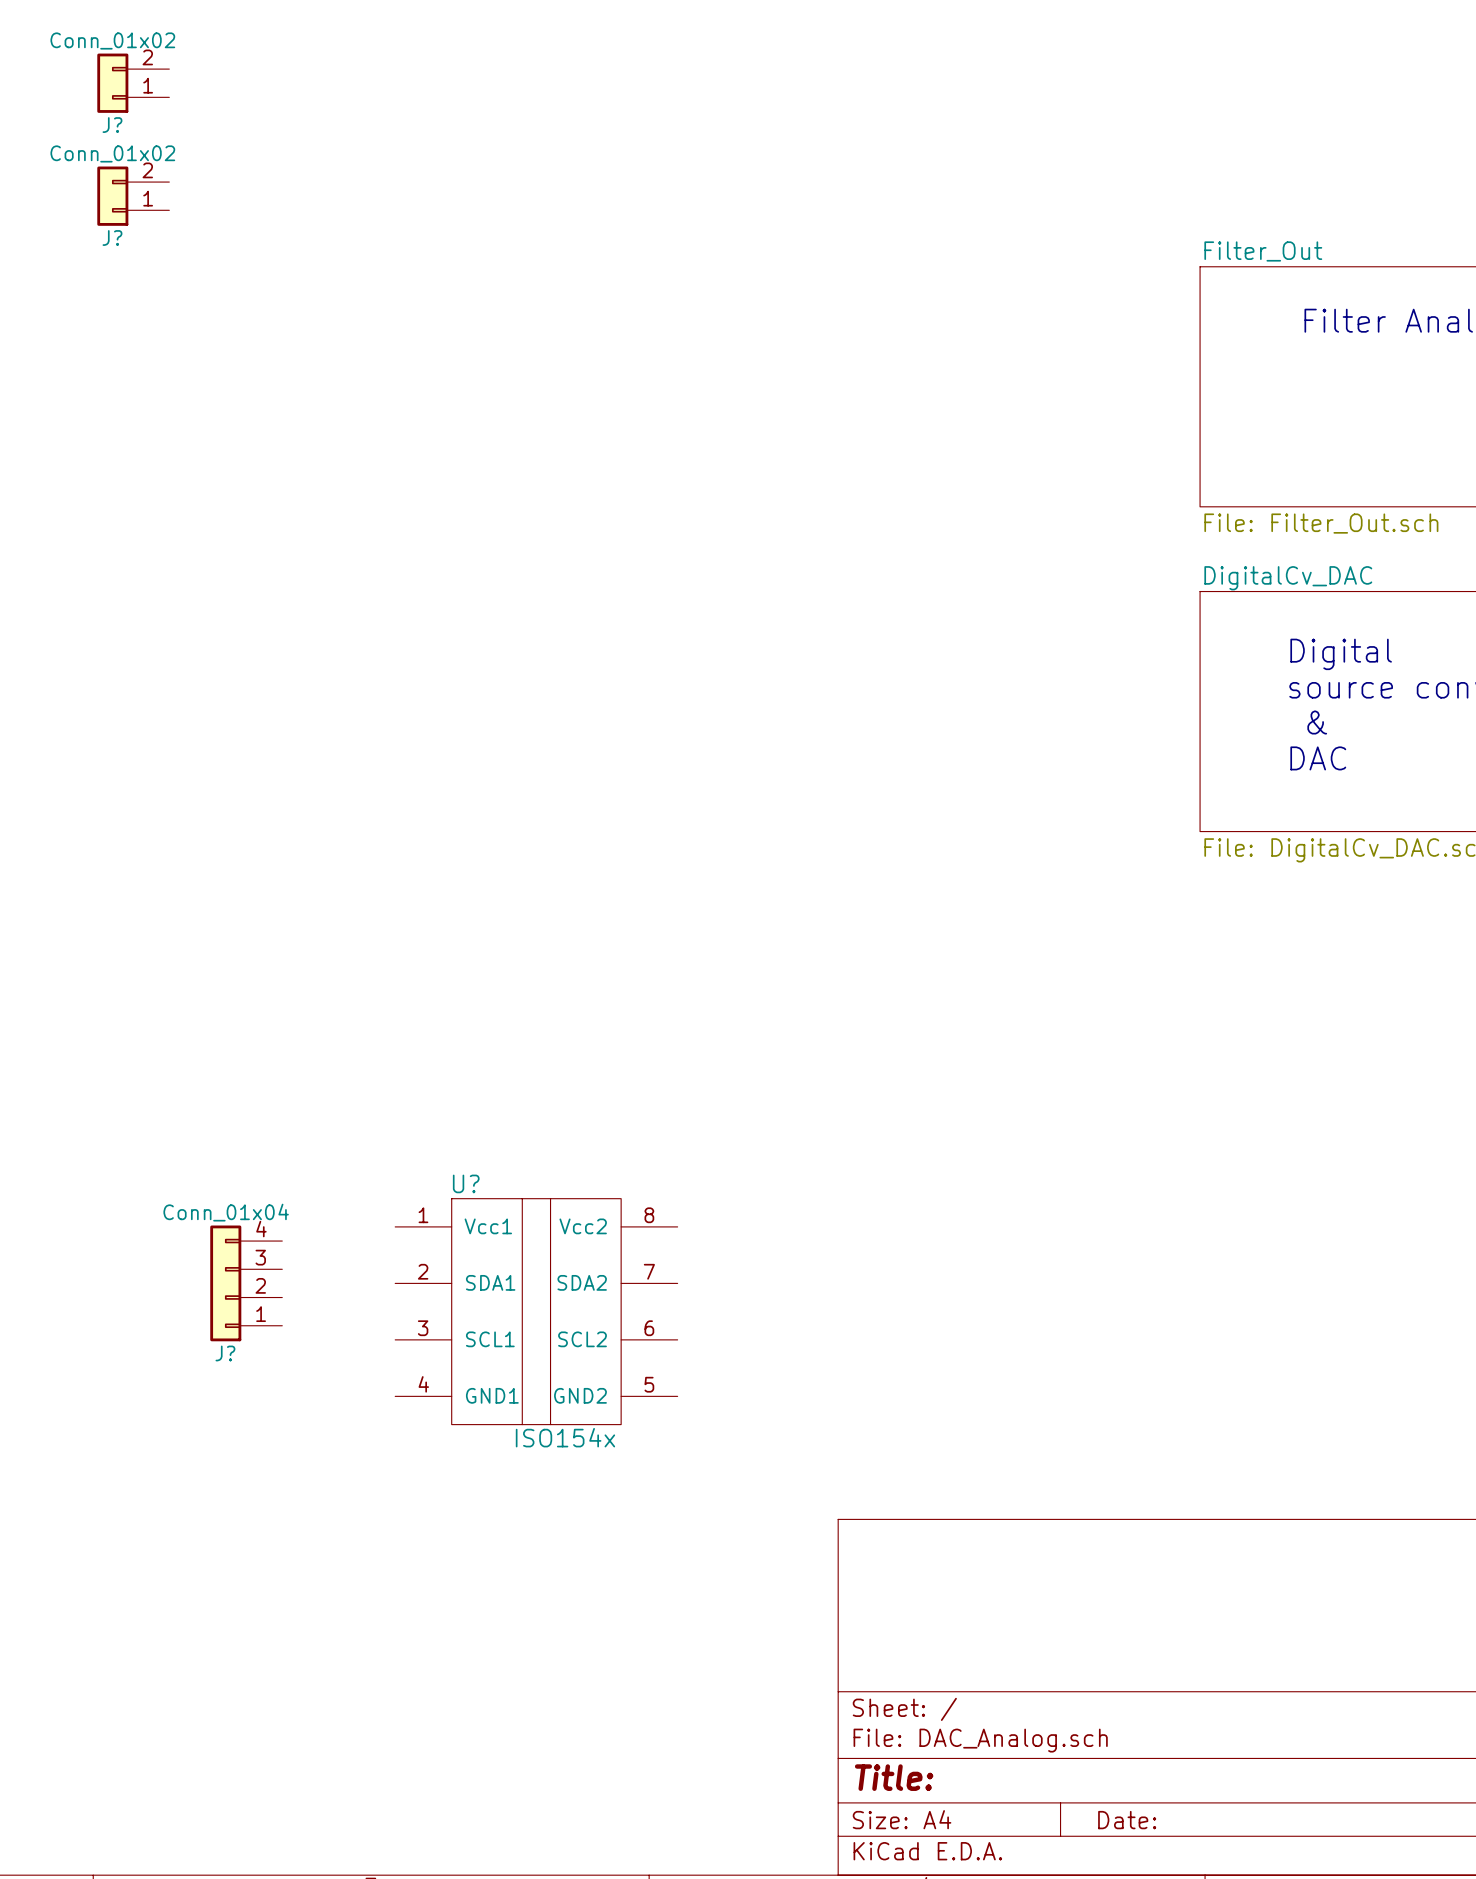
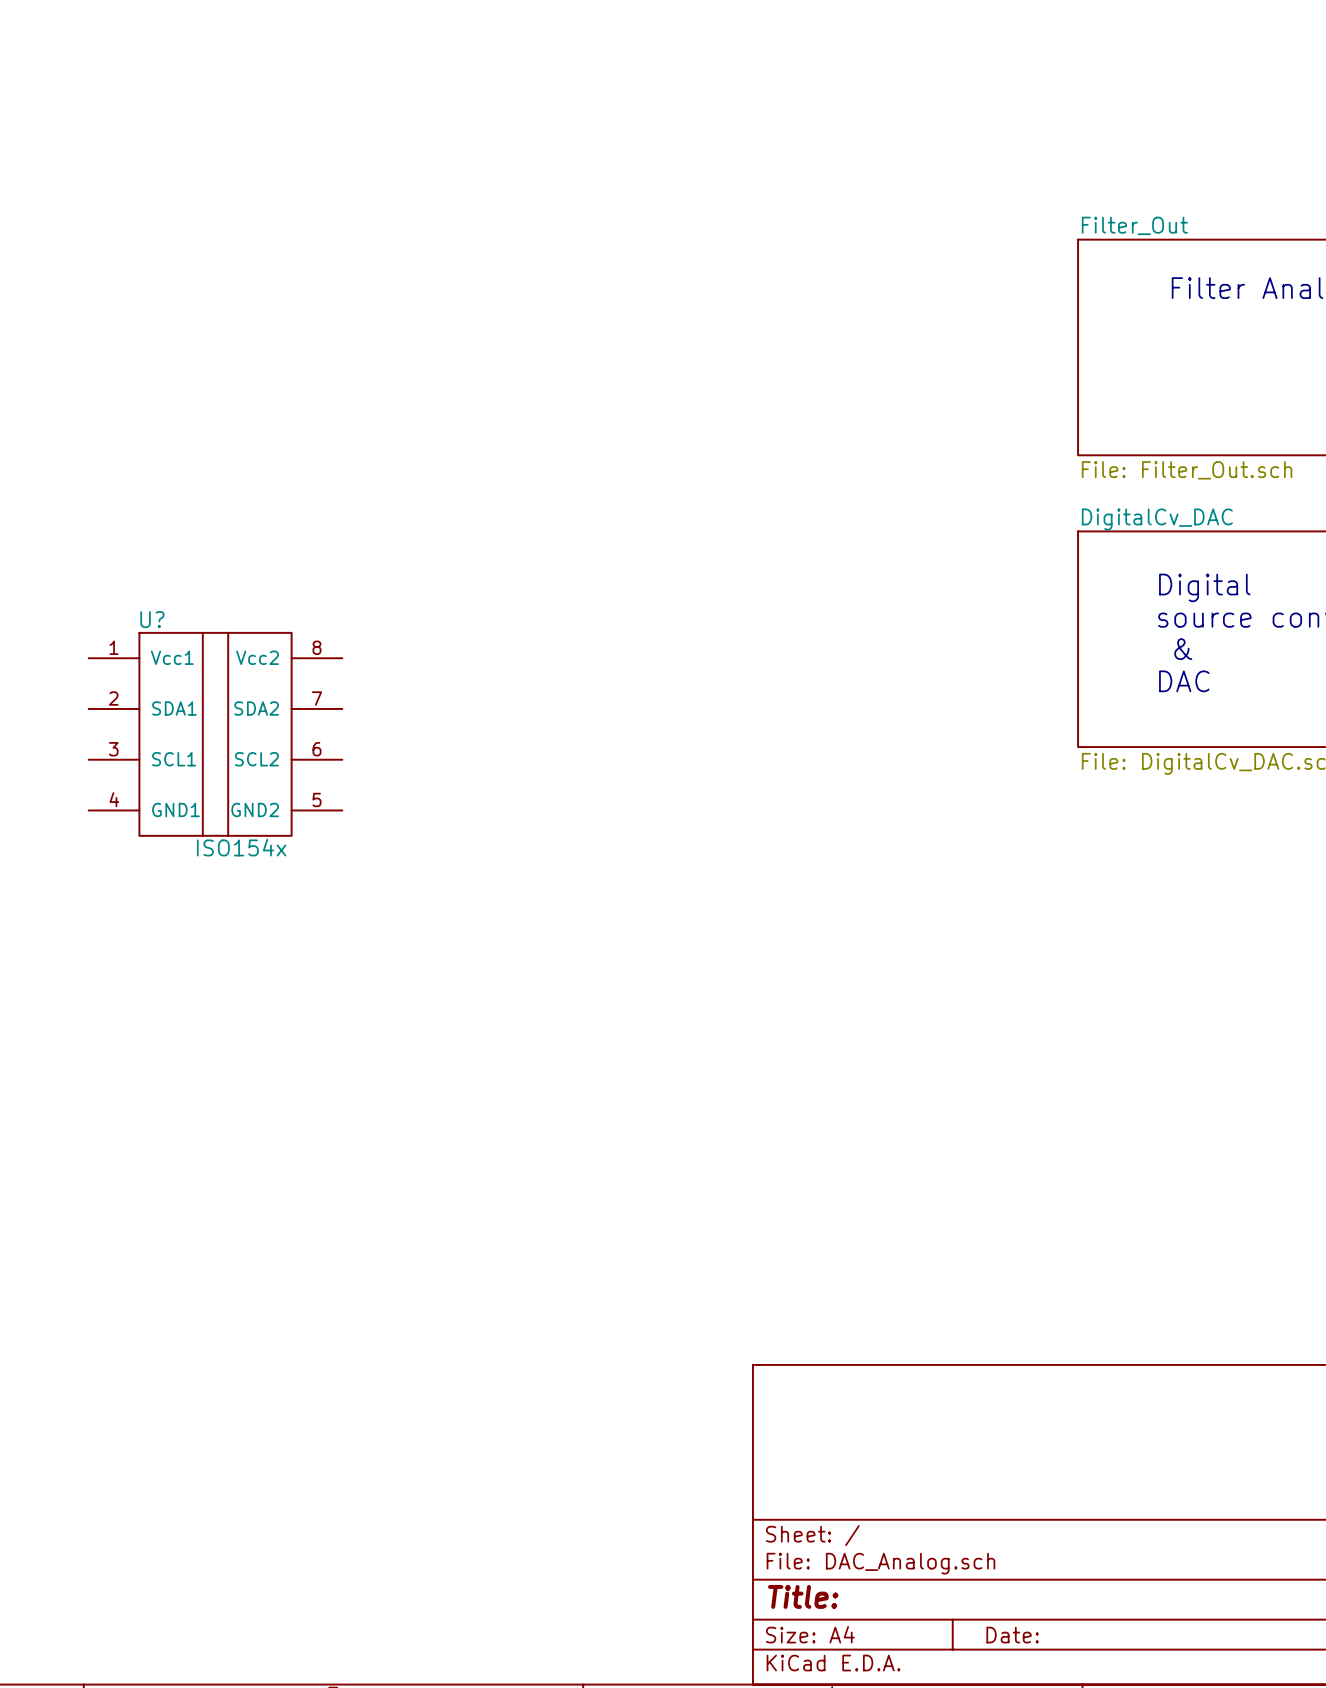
J?: Conn_01x02 (133, 83) -> none
J?: Conn_01x02 (133, 196) -> none
U?: none -> ISO154x (215, 734)
J?: Conn_01x04 (246, 1283) -> none
U?: ISO154x (536, 1311) -> none

